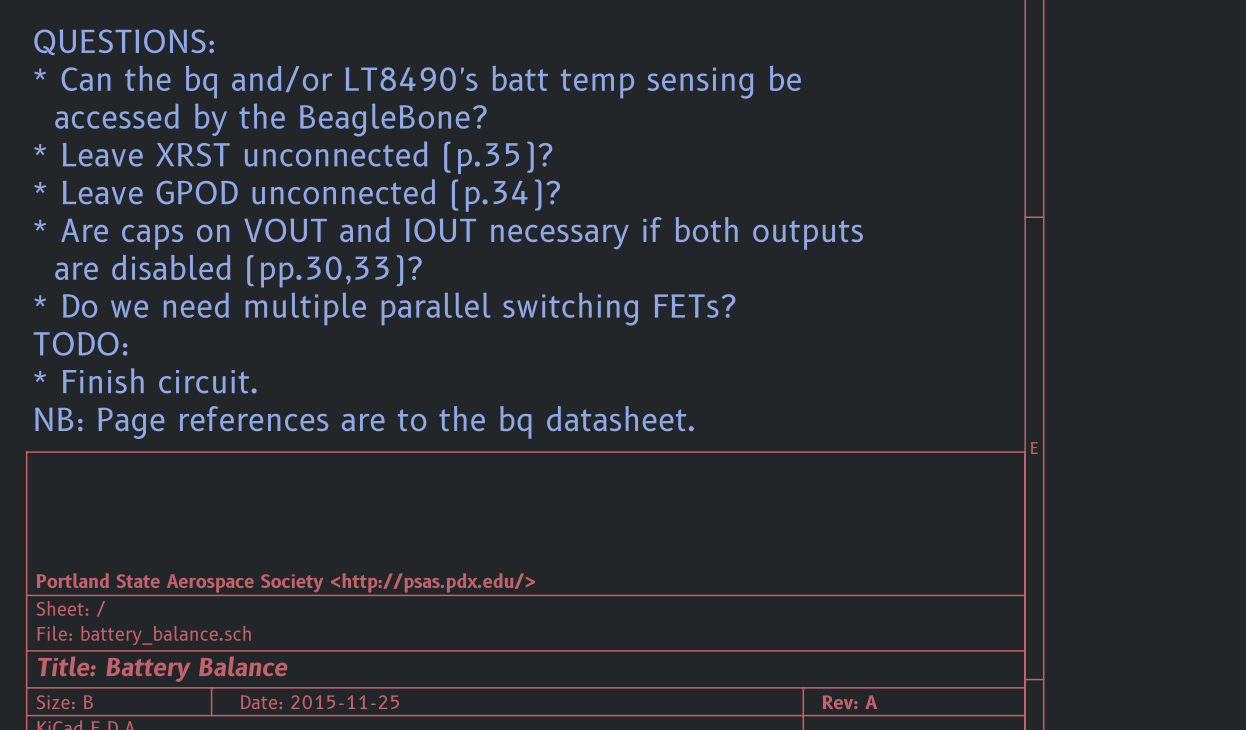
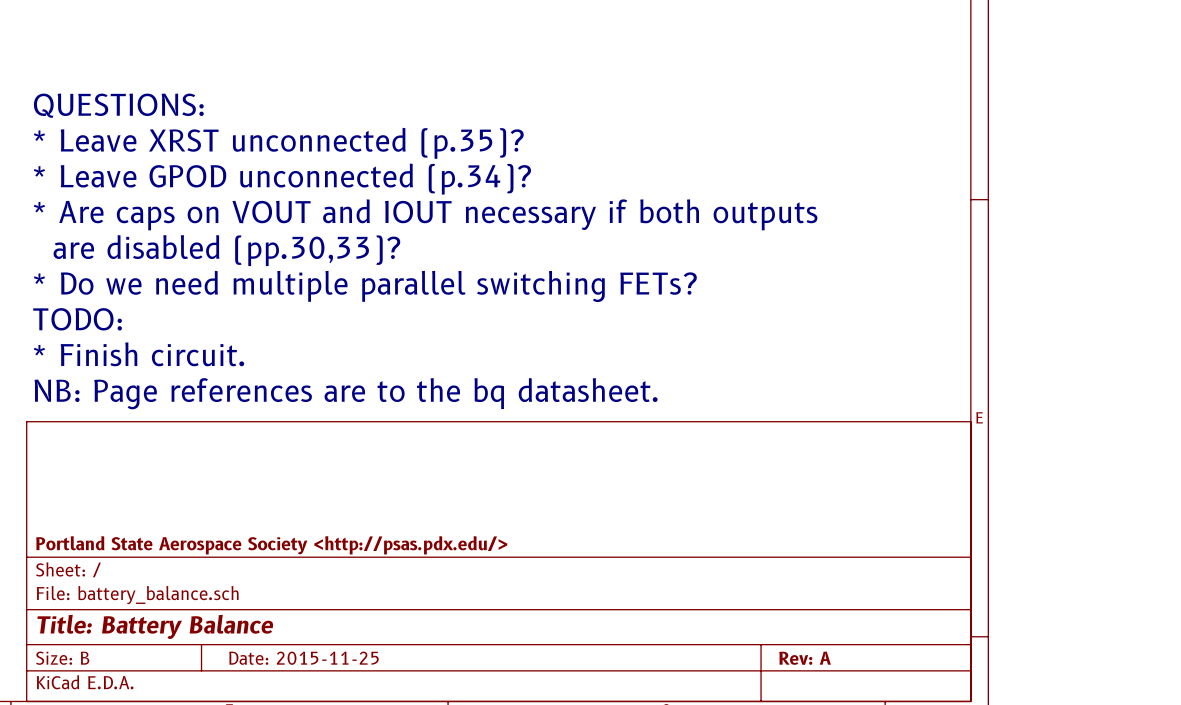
text: QUESTIONS: (124, 42) -> none
text: * Can the bq and/or LT8490's batt temp sensing be (417, 82) -> none
text: accessed by the BeagleBone? (270, 120) -> QUESTIONS: (118, 105)

